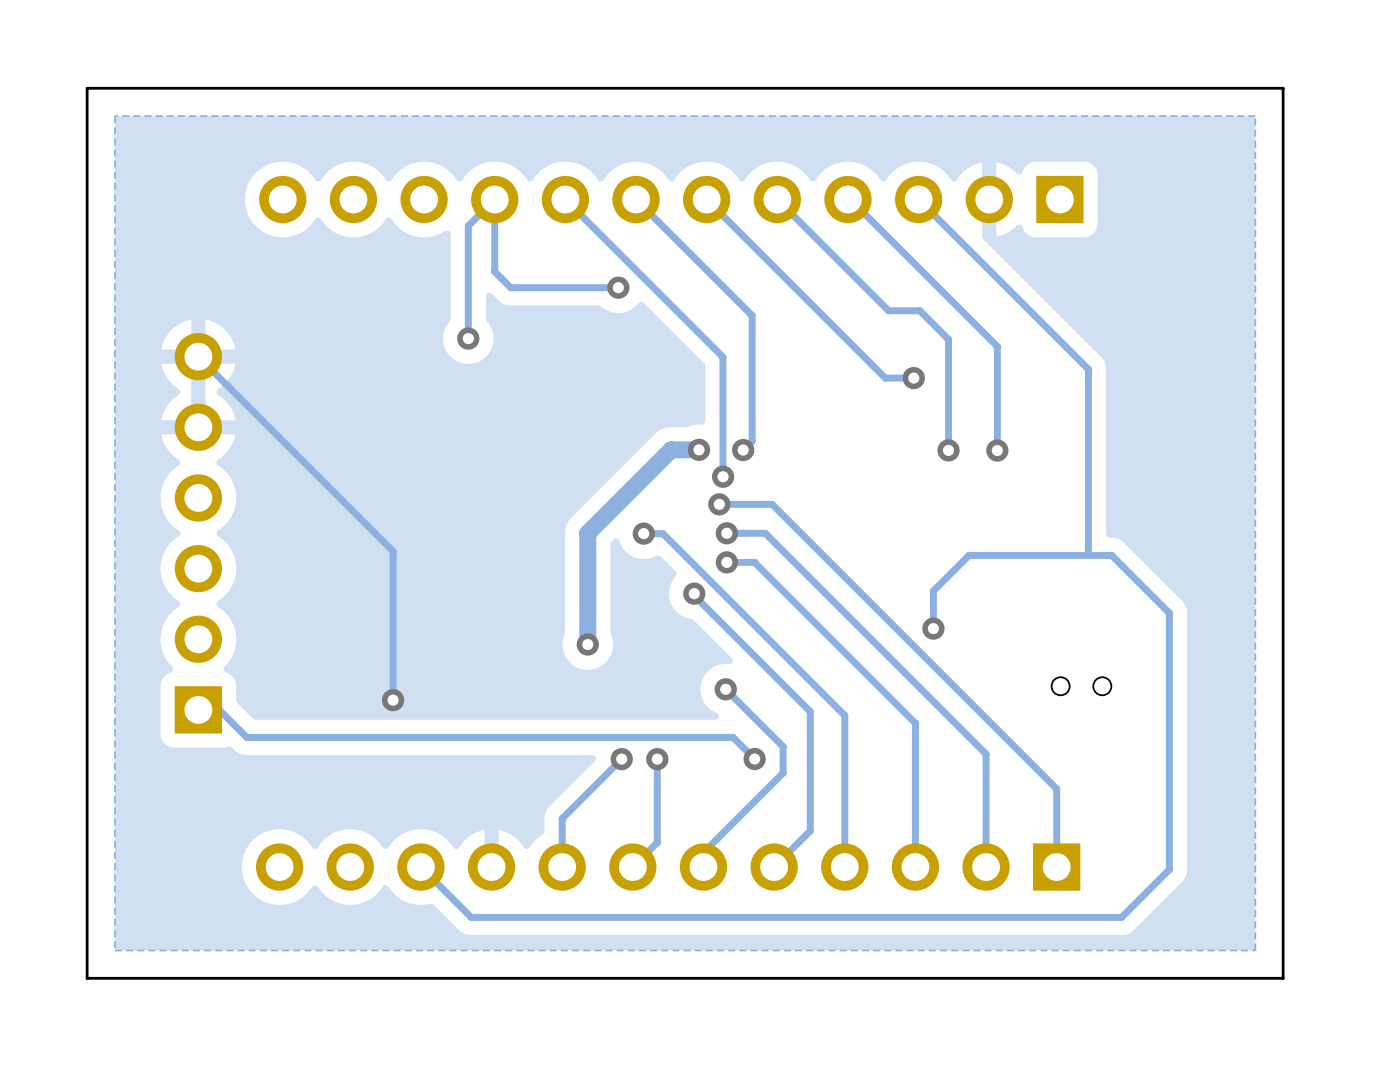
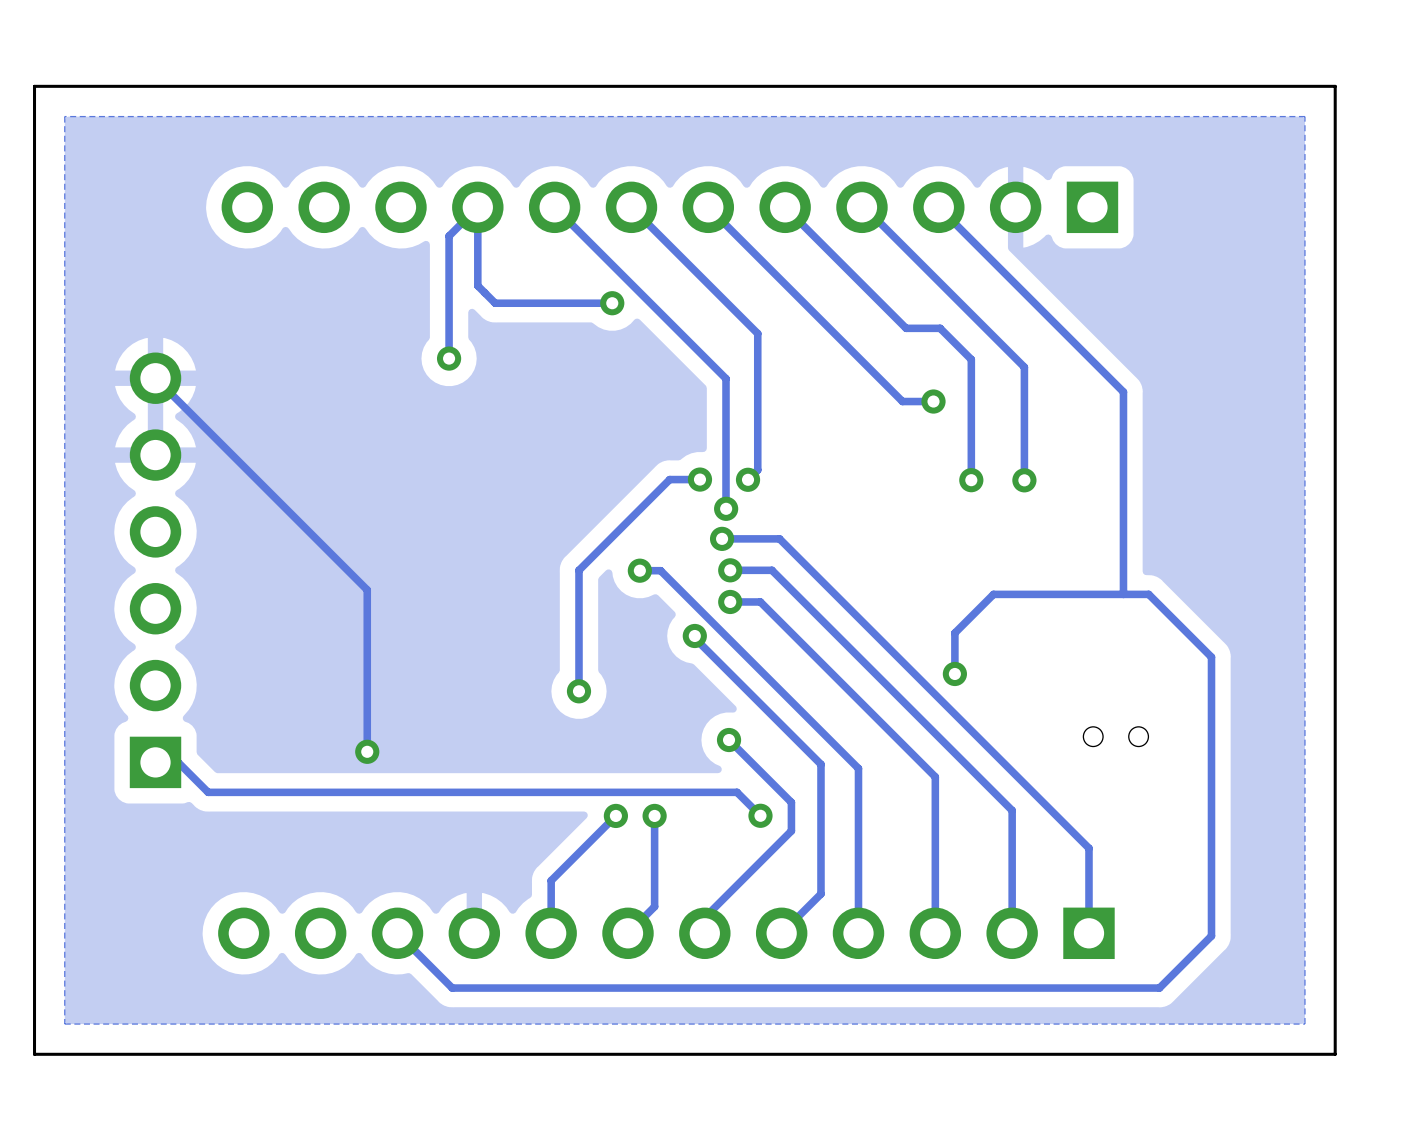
track width: thick (699, 449) (671, 449) (587, 533) (587, 644) -> thin (699, 479) (669, 479) (578, 570) (578, 691)

